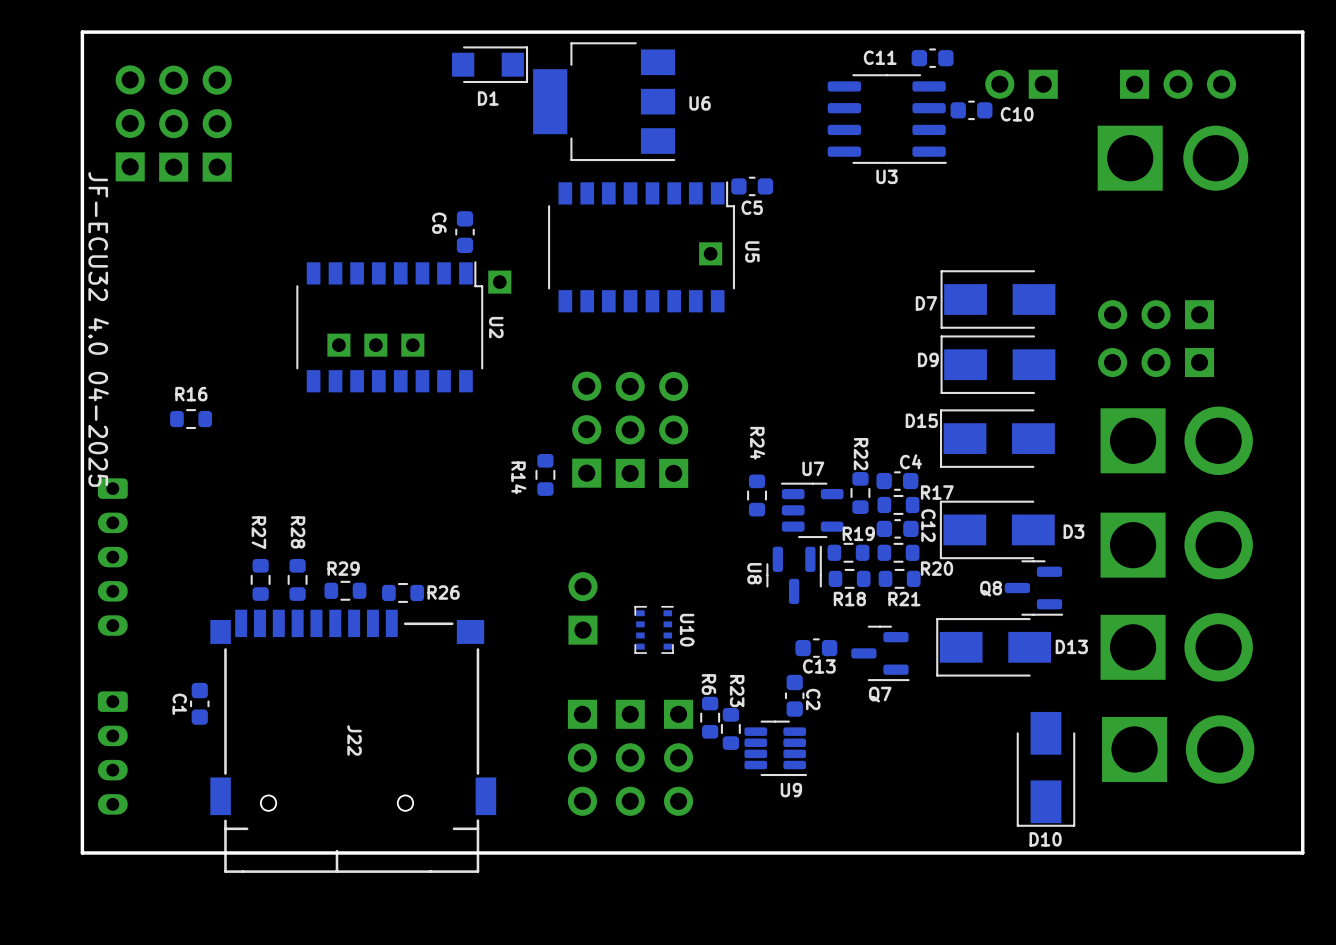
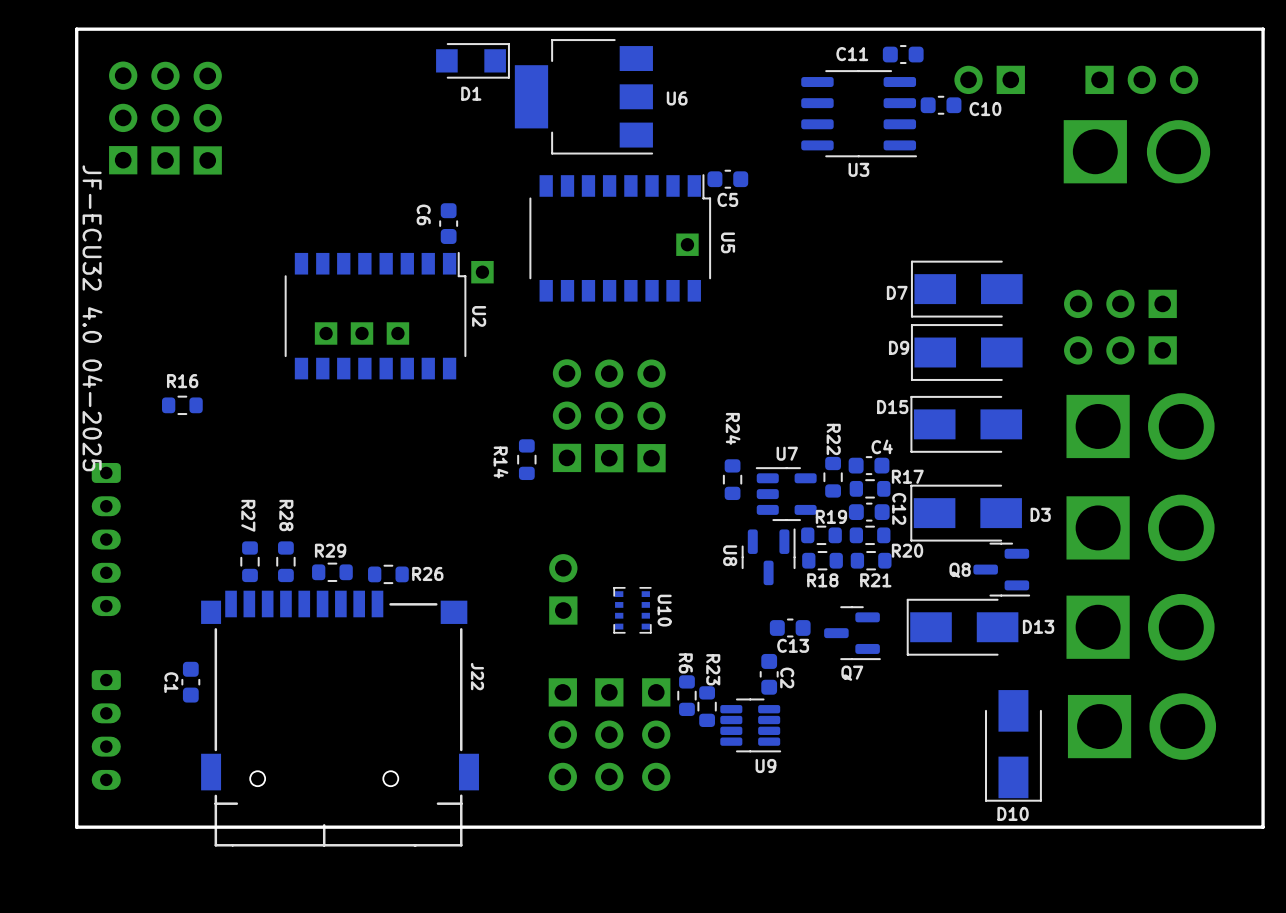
J22 name position: J22 (354, 740) -> J22 (477, 676)

